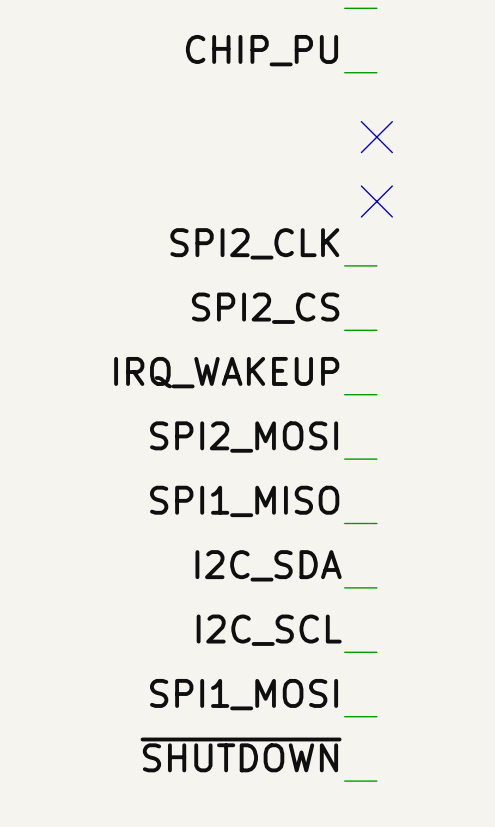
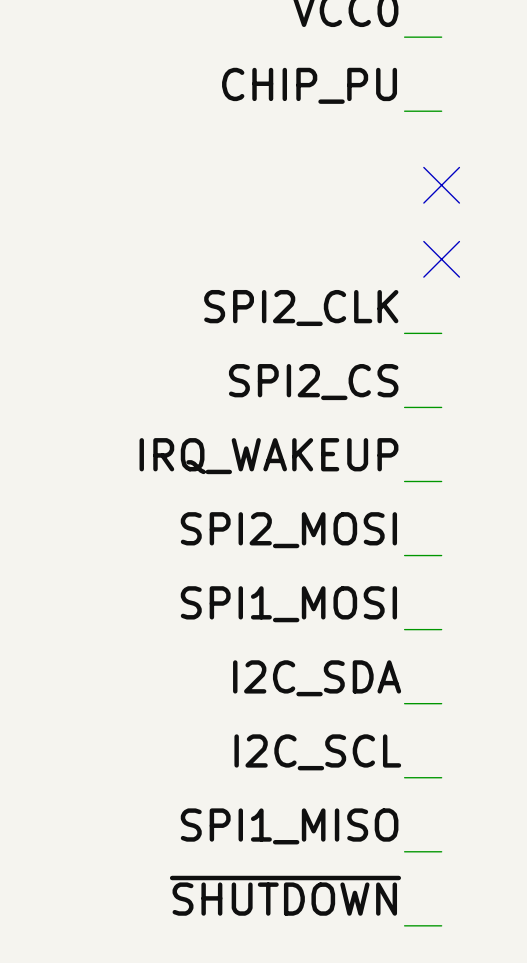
label: SPI1_MISO (244, 501) -> SPI1_MOSI (288, 604)
label: SPI1_MOSI (244, 694) -> SPI1_MISO (289, 826)

